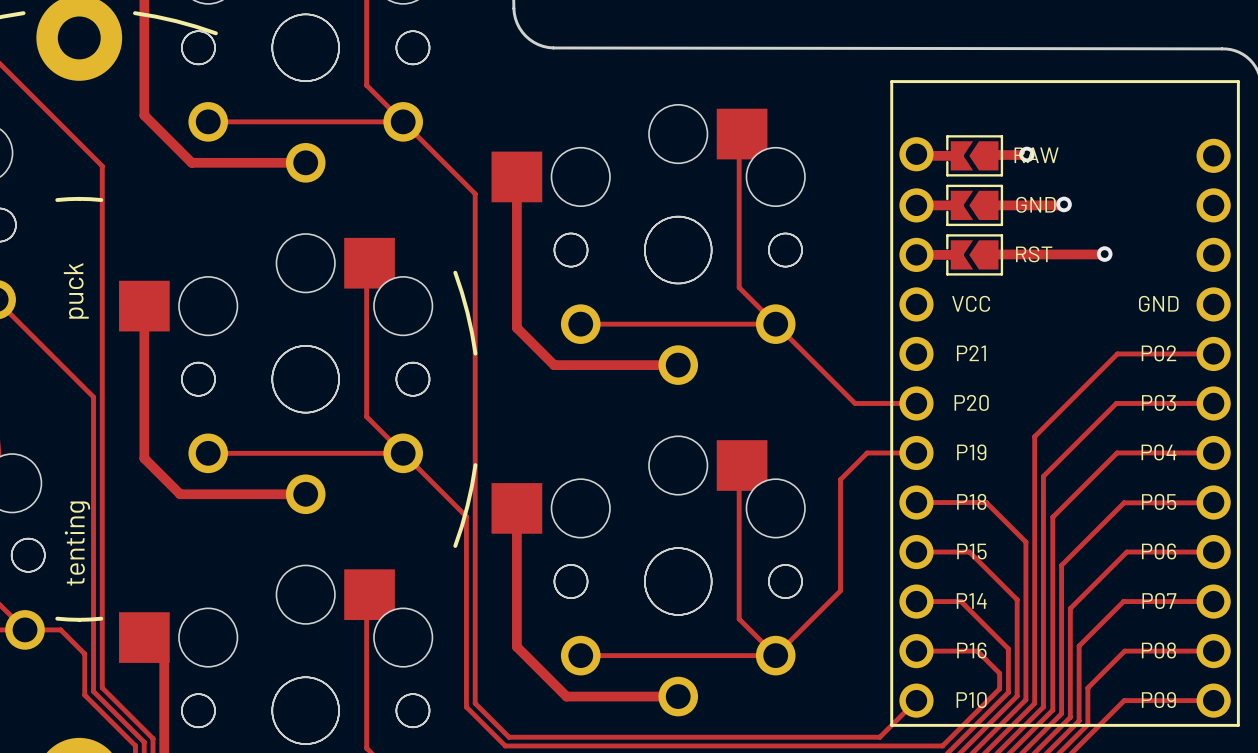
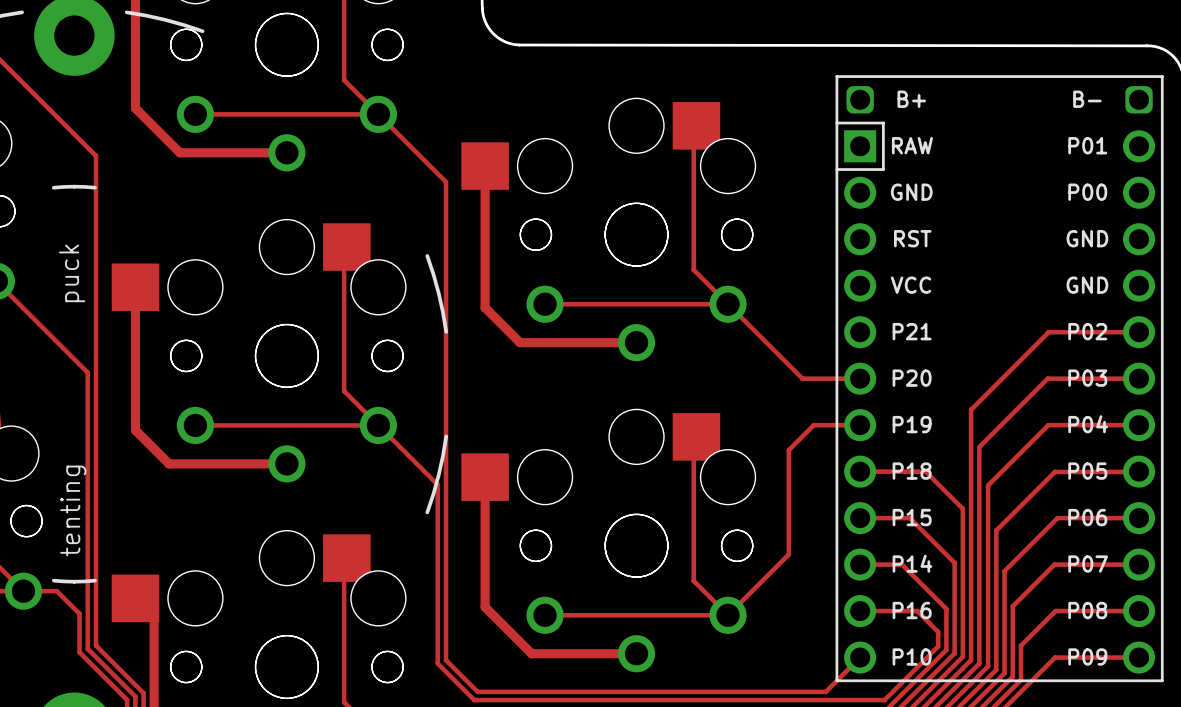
part footprint: [890, 80, 1240, 727] -> [835, 75, 1164, 683]
track: (1026, 154) (988, 155) -> none
via: (1026, 154) -> none
track: (1064, 204) (988, 205) -> none
via: (1064, 204) -> none
track: (1104, 254) (988, 254) -> none
via: (1104, 254) -> none

